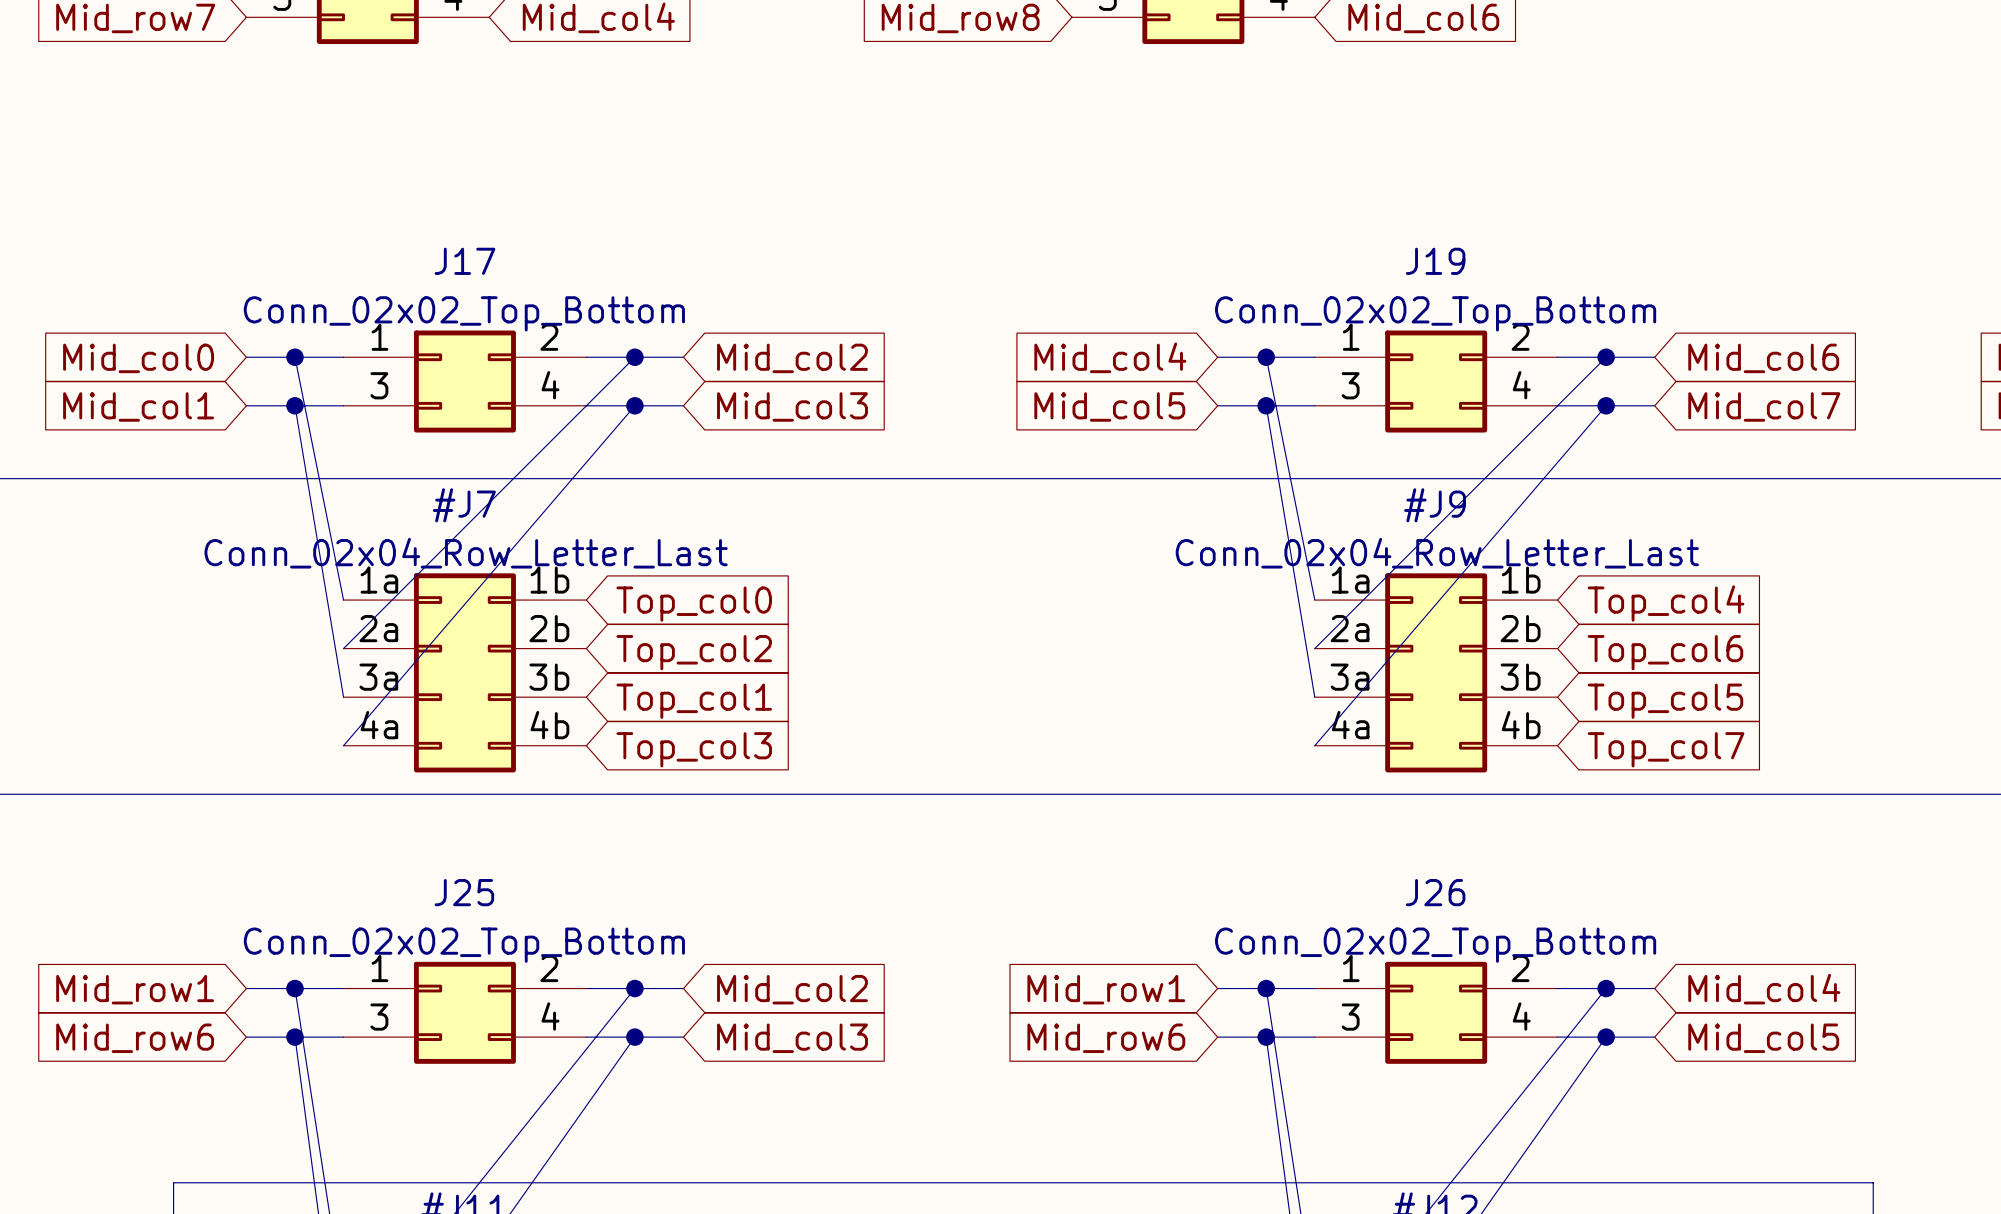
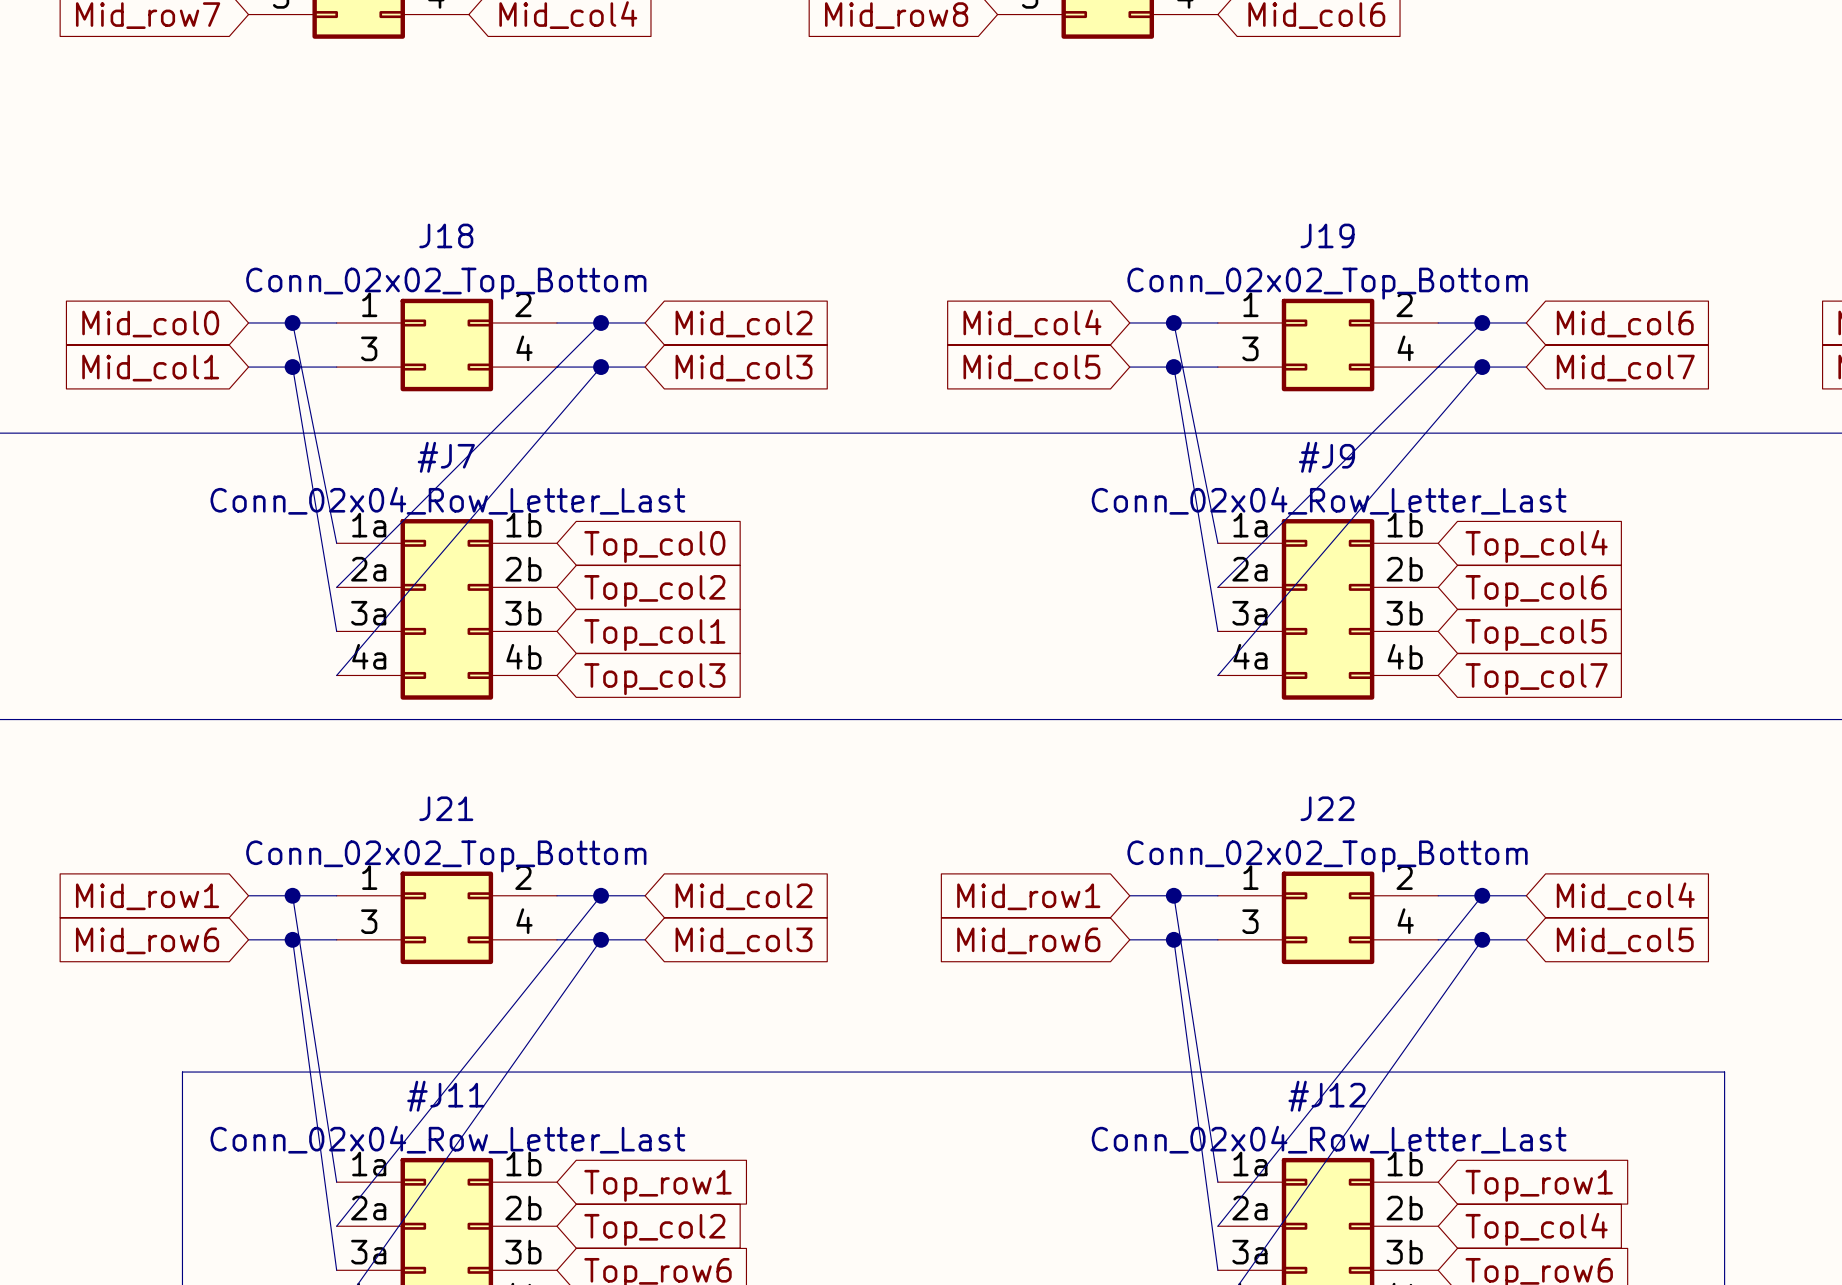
J17 name: J17 (464, 261) -> J18 (446, 235)
J25 name: J25 (464, 892) -> J21 (446, 808)
J26 name: J26 (1435, 892) -> J22 (1327, 808)

